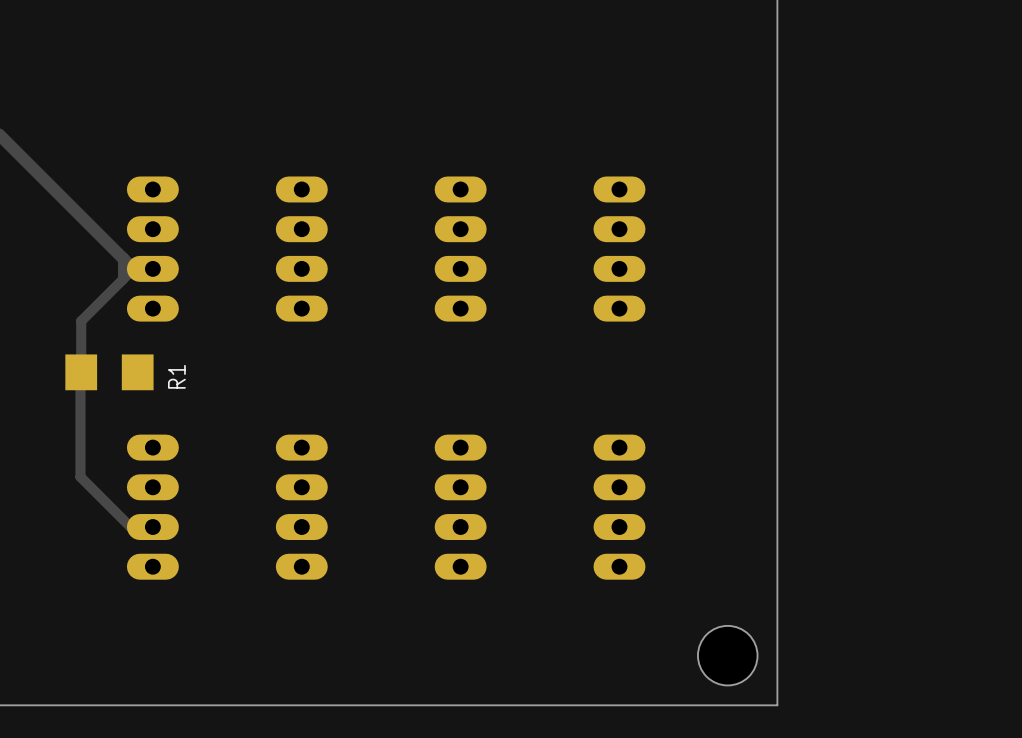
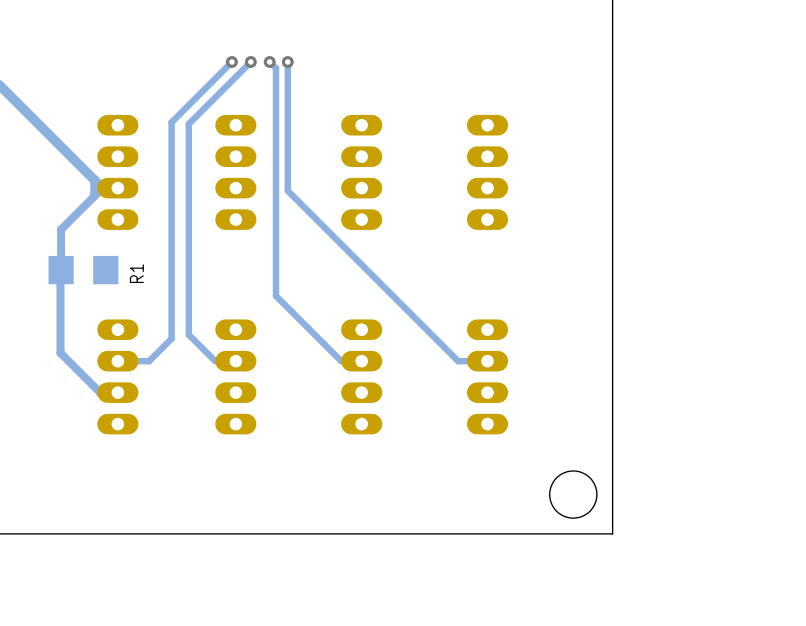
track: none -> (231, 61) (171, 122) (171, 338) (149, 361) (117, 361)
via: none -> (231, 61)
track: none -> (250, 61) (188, 123) (188, 334) (215, 361) (235, 361)
via: none -> (250, 61)
track: none -> (269, 61) (276, 68) (276, 295) (341, 361) (361, 361)
via: none -> (269, 61)
track: none -> (287, 61) (287, 190) (458, 361) (487, 361)
via: none -> (287, 61)

